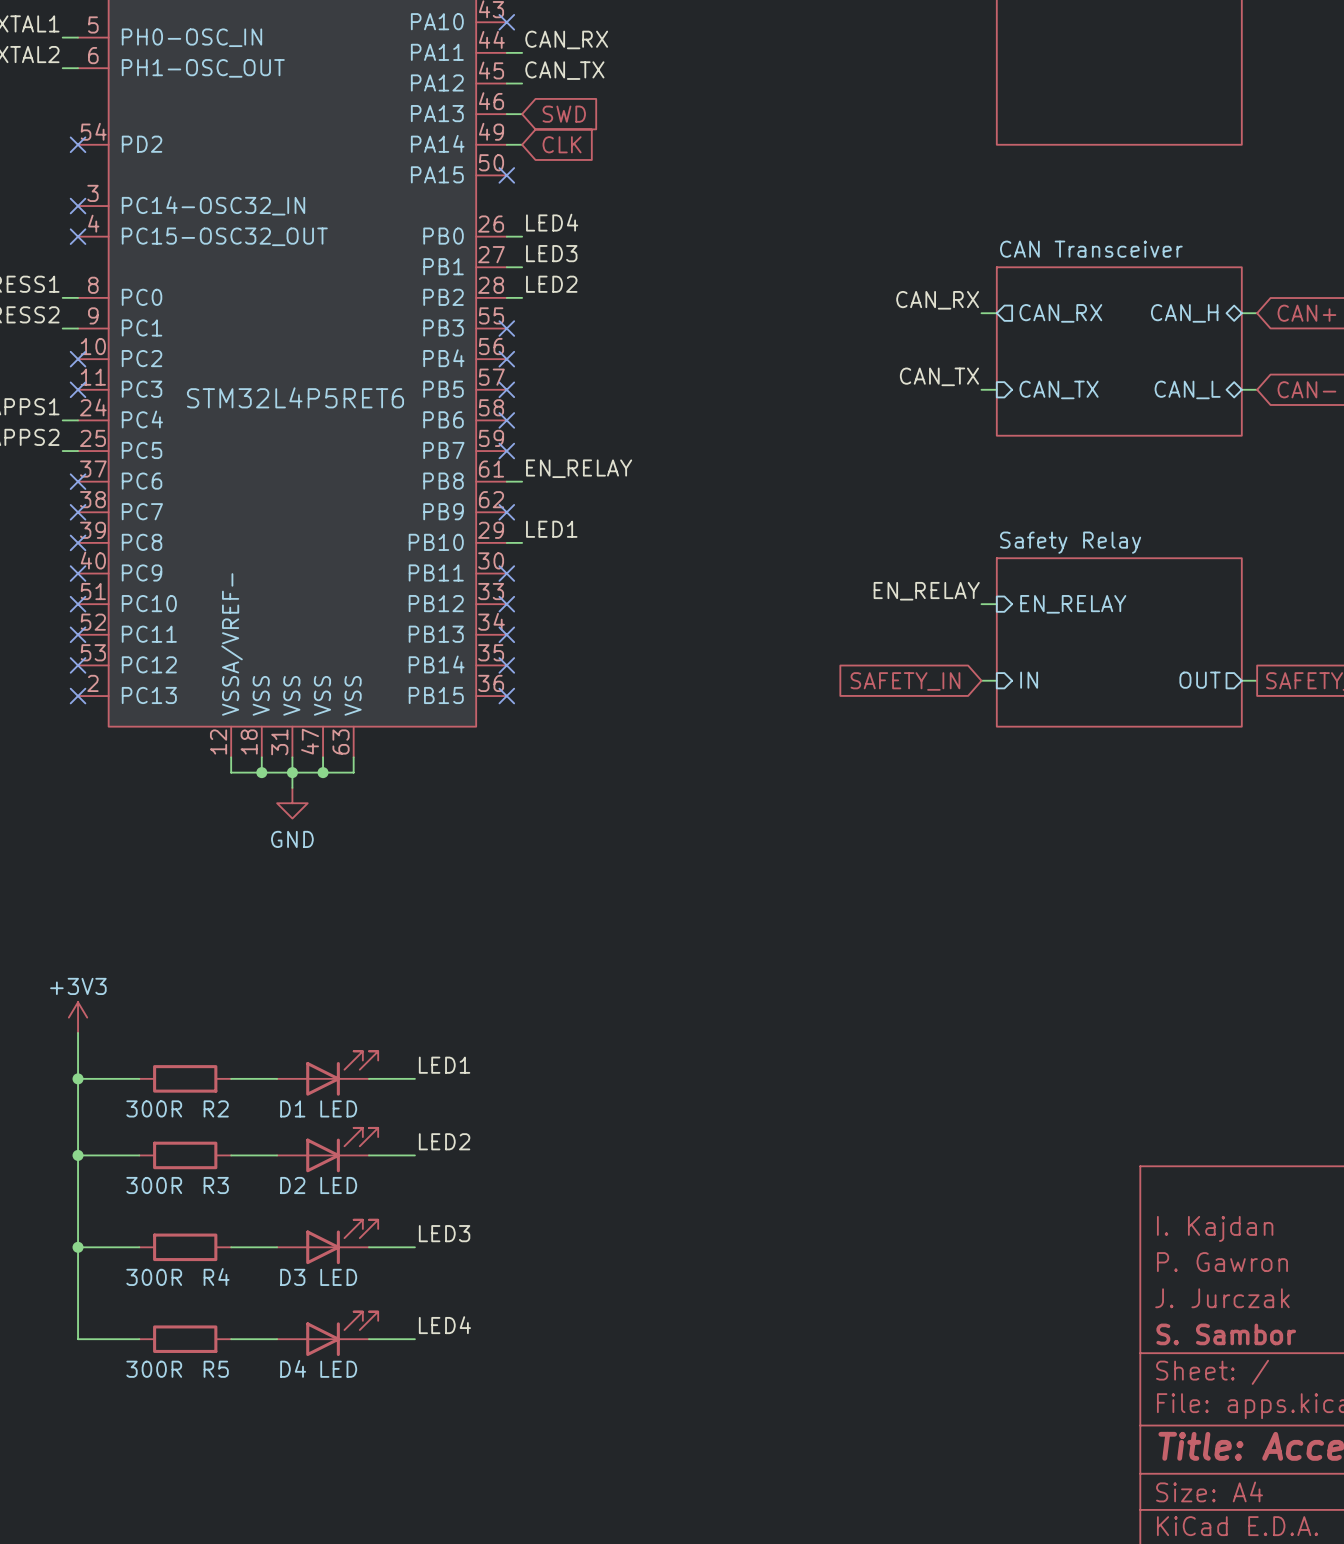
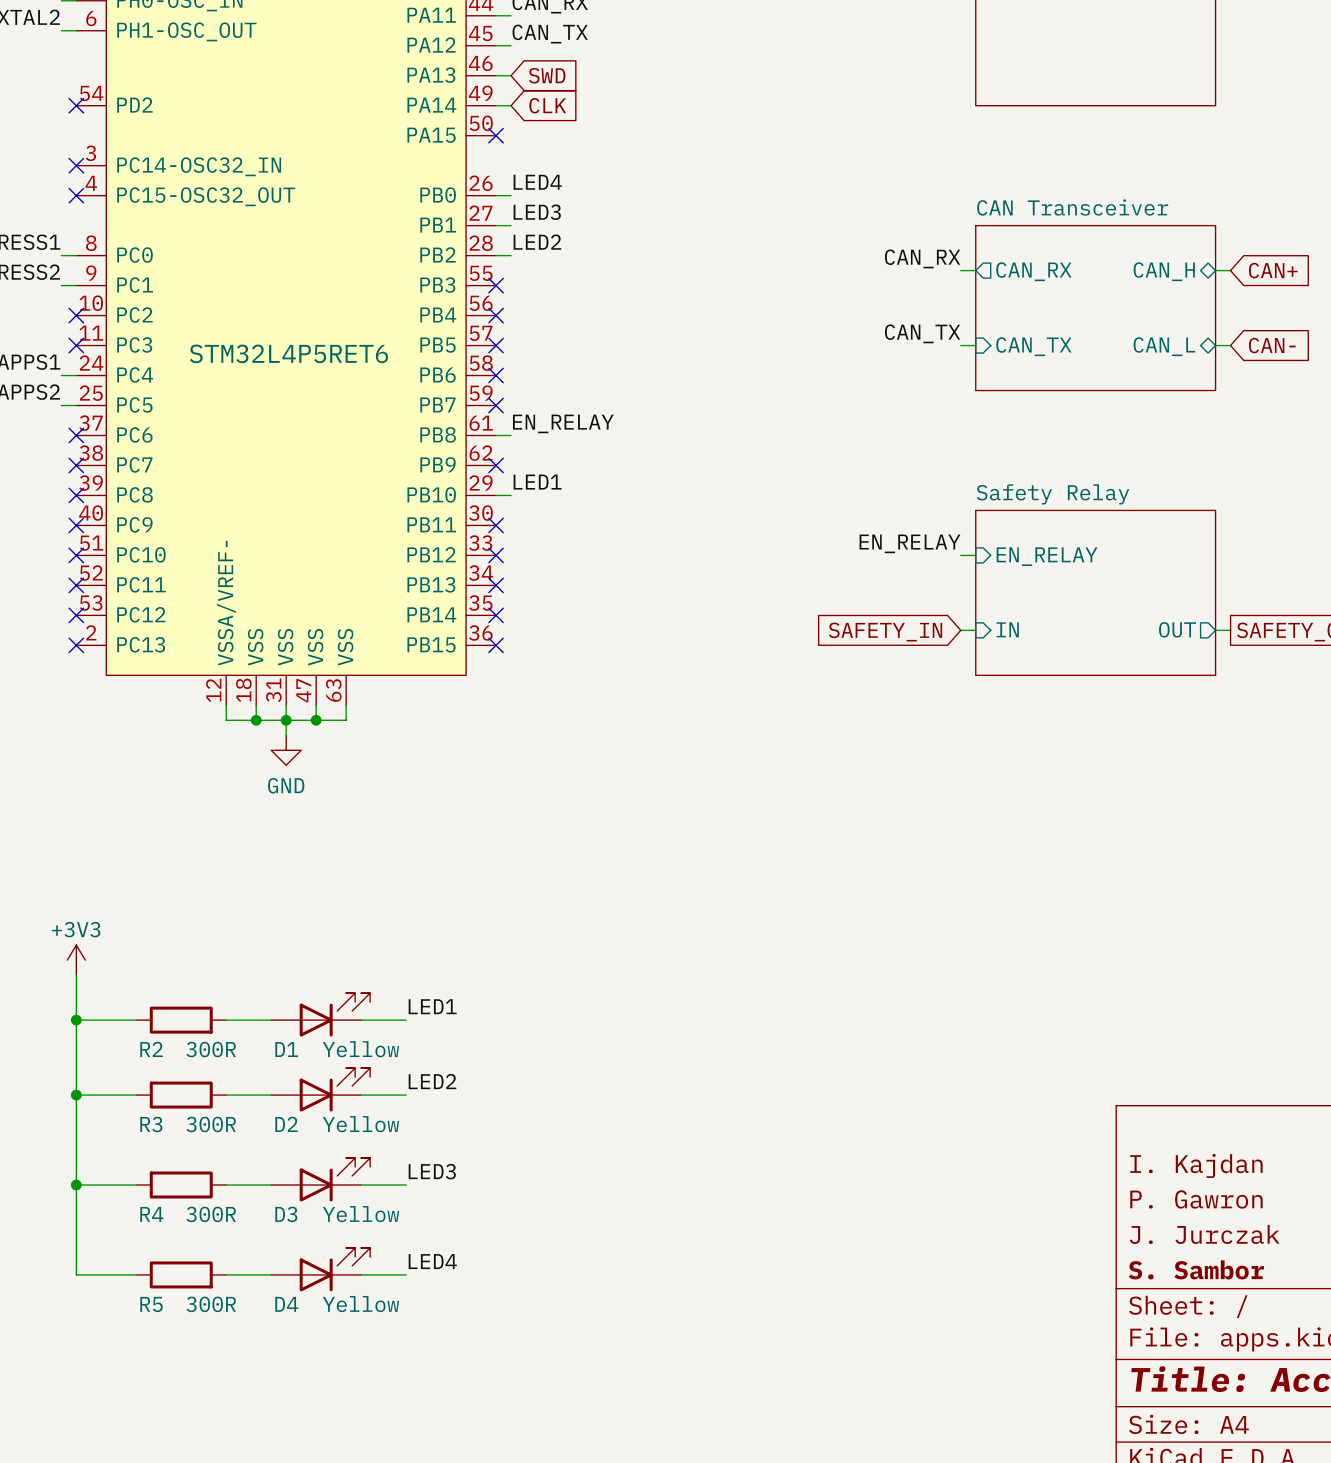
R2 value position: 300R (154, 1108) -> 300R (211, 1049)
R2 name position: R2 (216, 1108) -> R2 (151, 1049)
D1 value: LED (338, 1108) -> Yellow (360, 1049)
R3 value position: 300R (154, 1185) -> 300R (211, 1124)
R3 name position: R3 (216, 1185) -> R3 (151, 1124)
D2 value: LED (338, 1185) -> Yellow (360, 1124)
R4 value position: 300R (154, 1277) -> 300R (211, 1214)
R4 name position: R4 (216, 1277) -> R4 (151, 1214)
D3 value: LED (338, 1277) -> Yellow (360, 1214)
R5 value position: 300R (154, 1369) -> 300R (211, 1304)
R5 name position: R5 (216, 1369) -> R5 (151, 1304)
D4 value: LED (338, 1369) -> Yellow (360, 1304)

